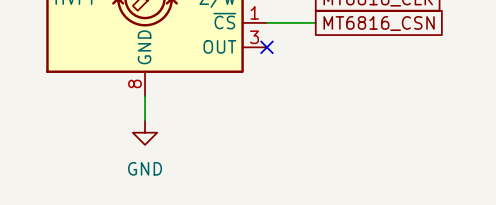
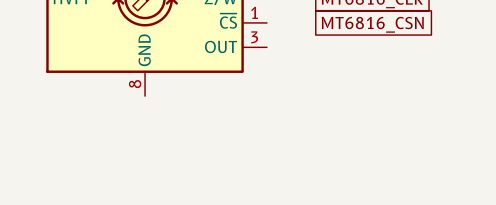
wire: (266, 22) (315, 22) -> none
no-connect mark: (266, 47) -> none
wire: (145, 96) (145, 120) -> none
power symbol: GND (145, 132) -> none

